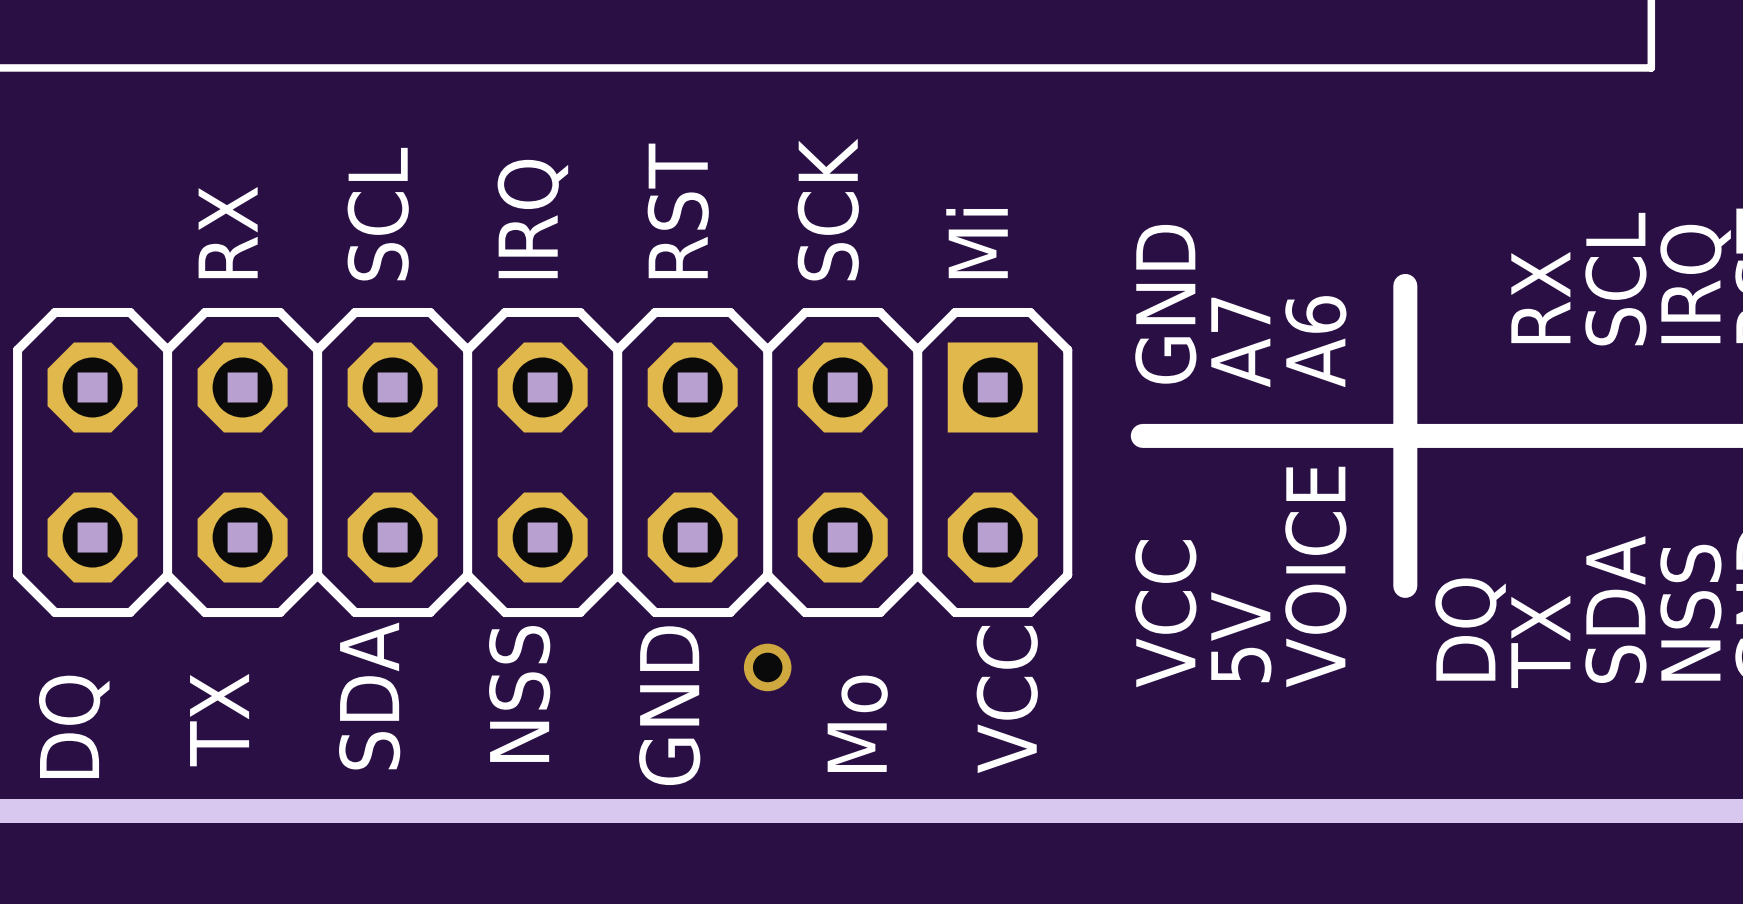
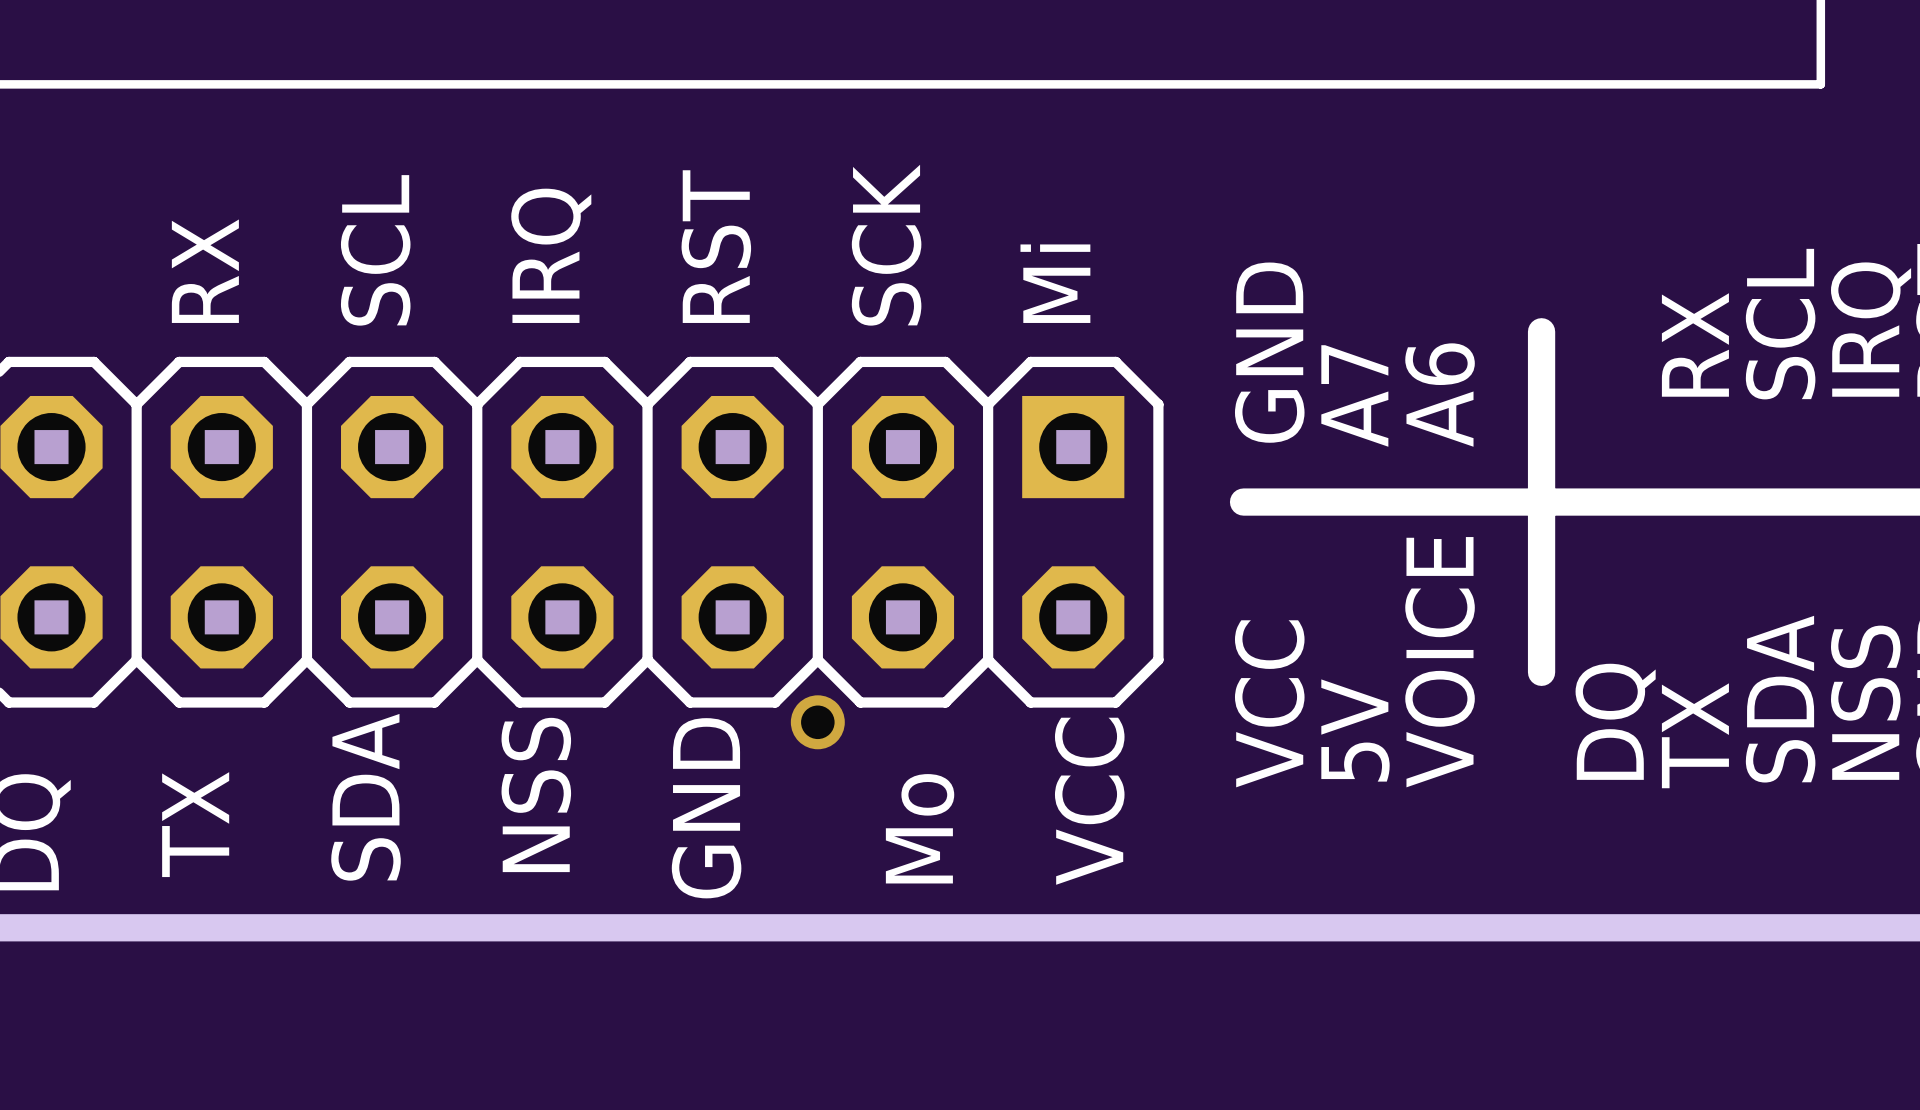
via position: (767, 667) -> (817, 722)

